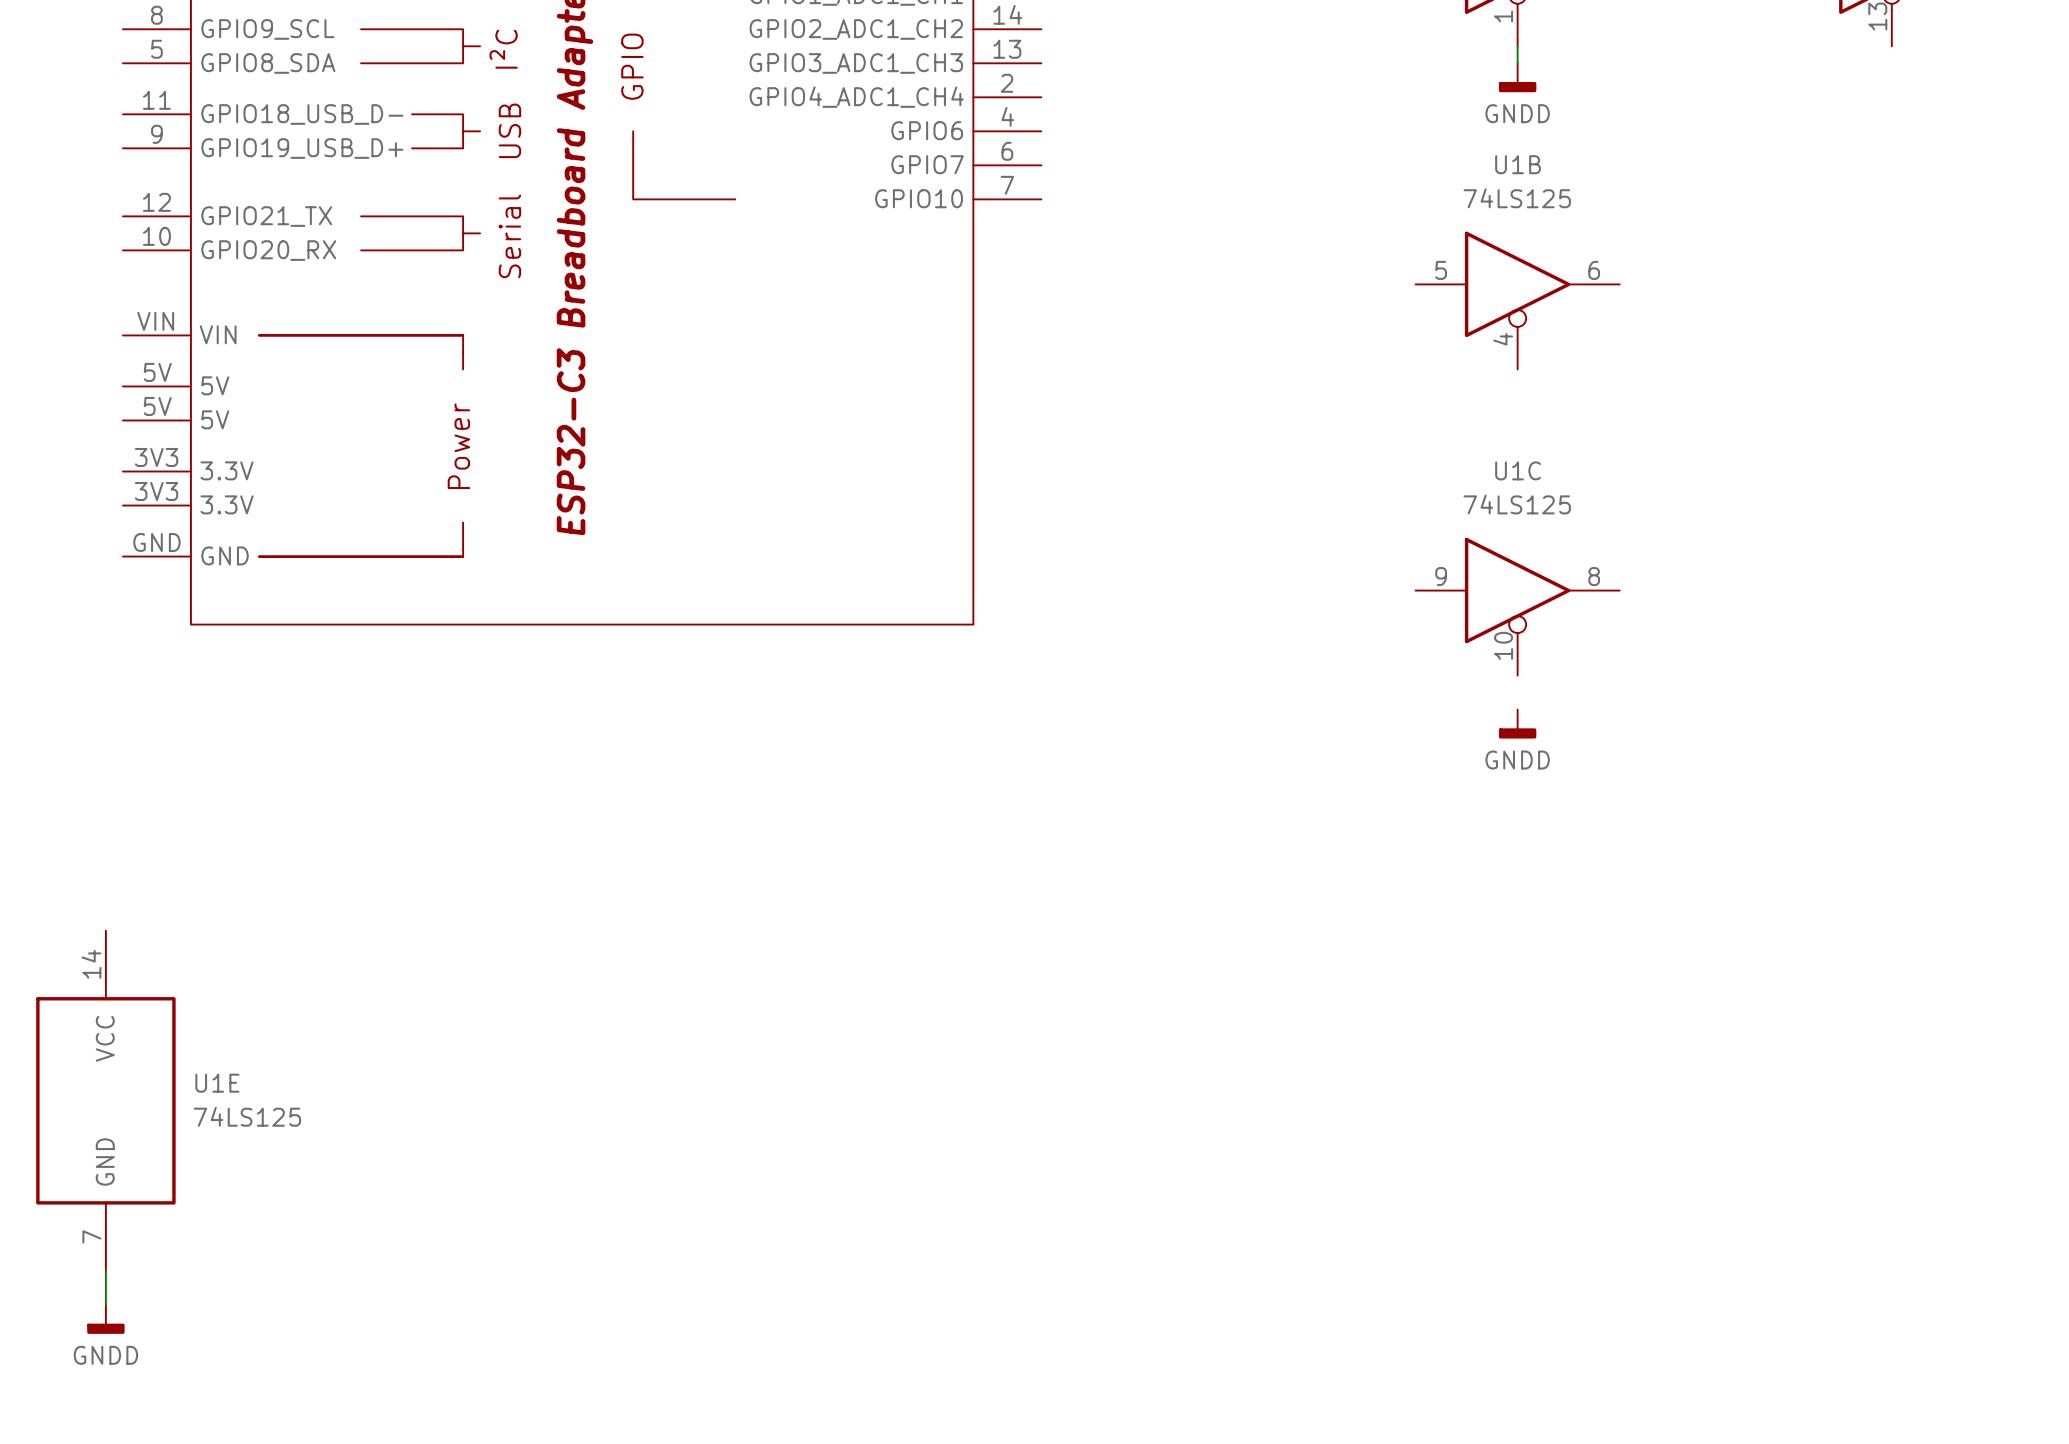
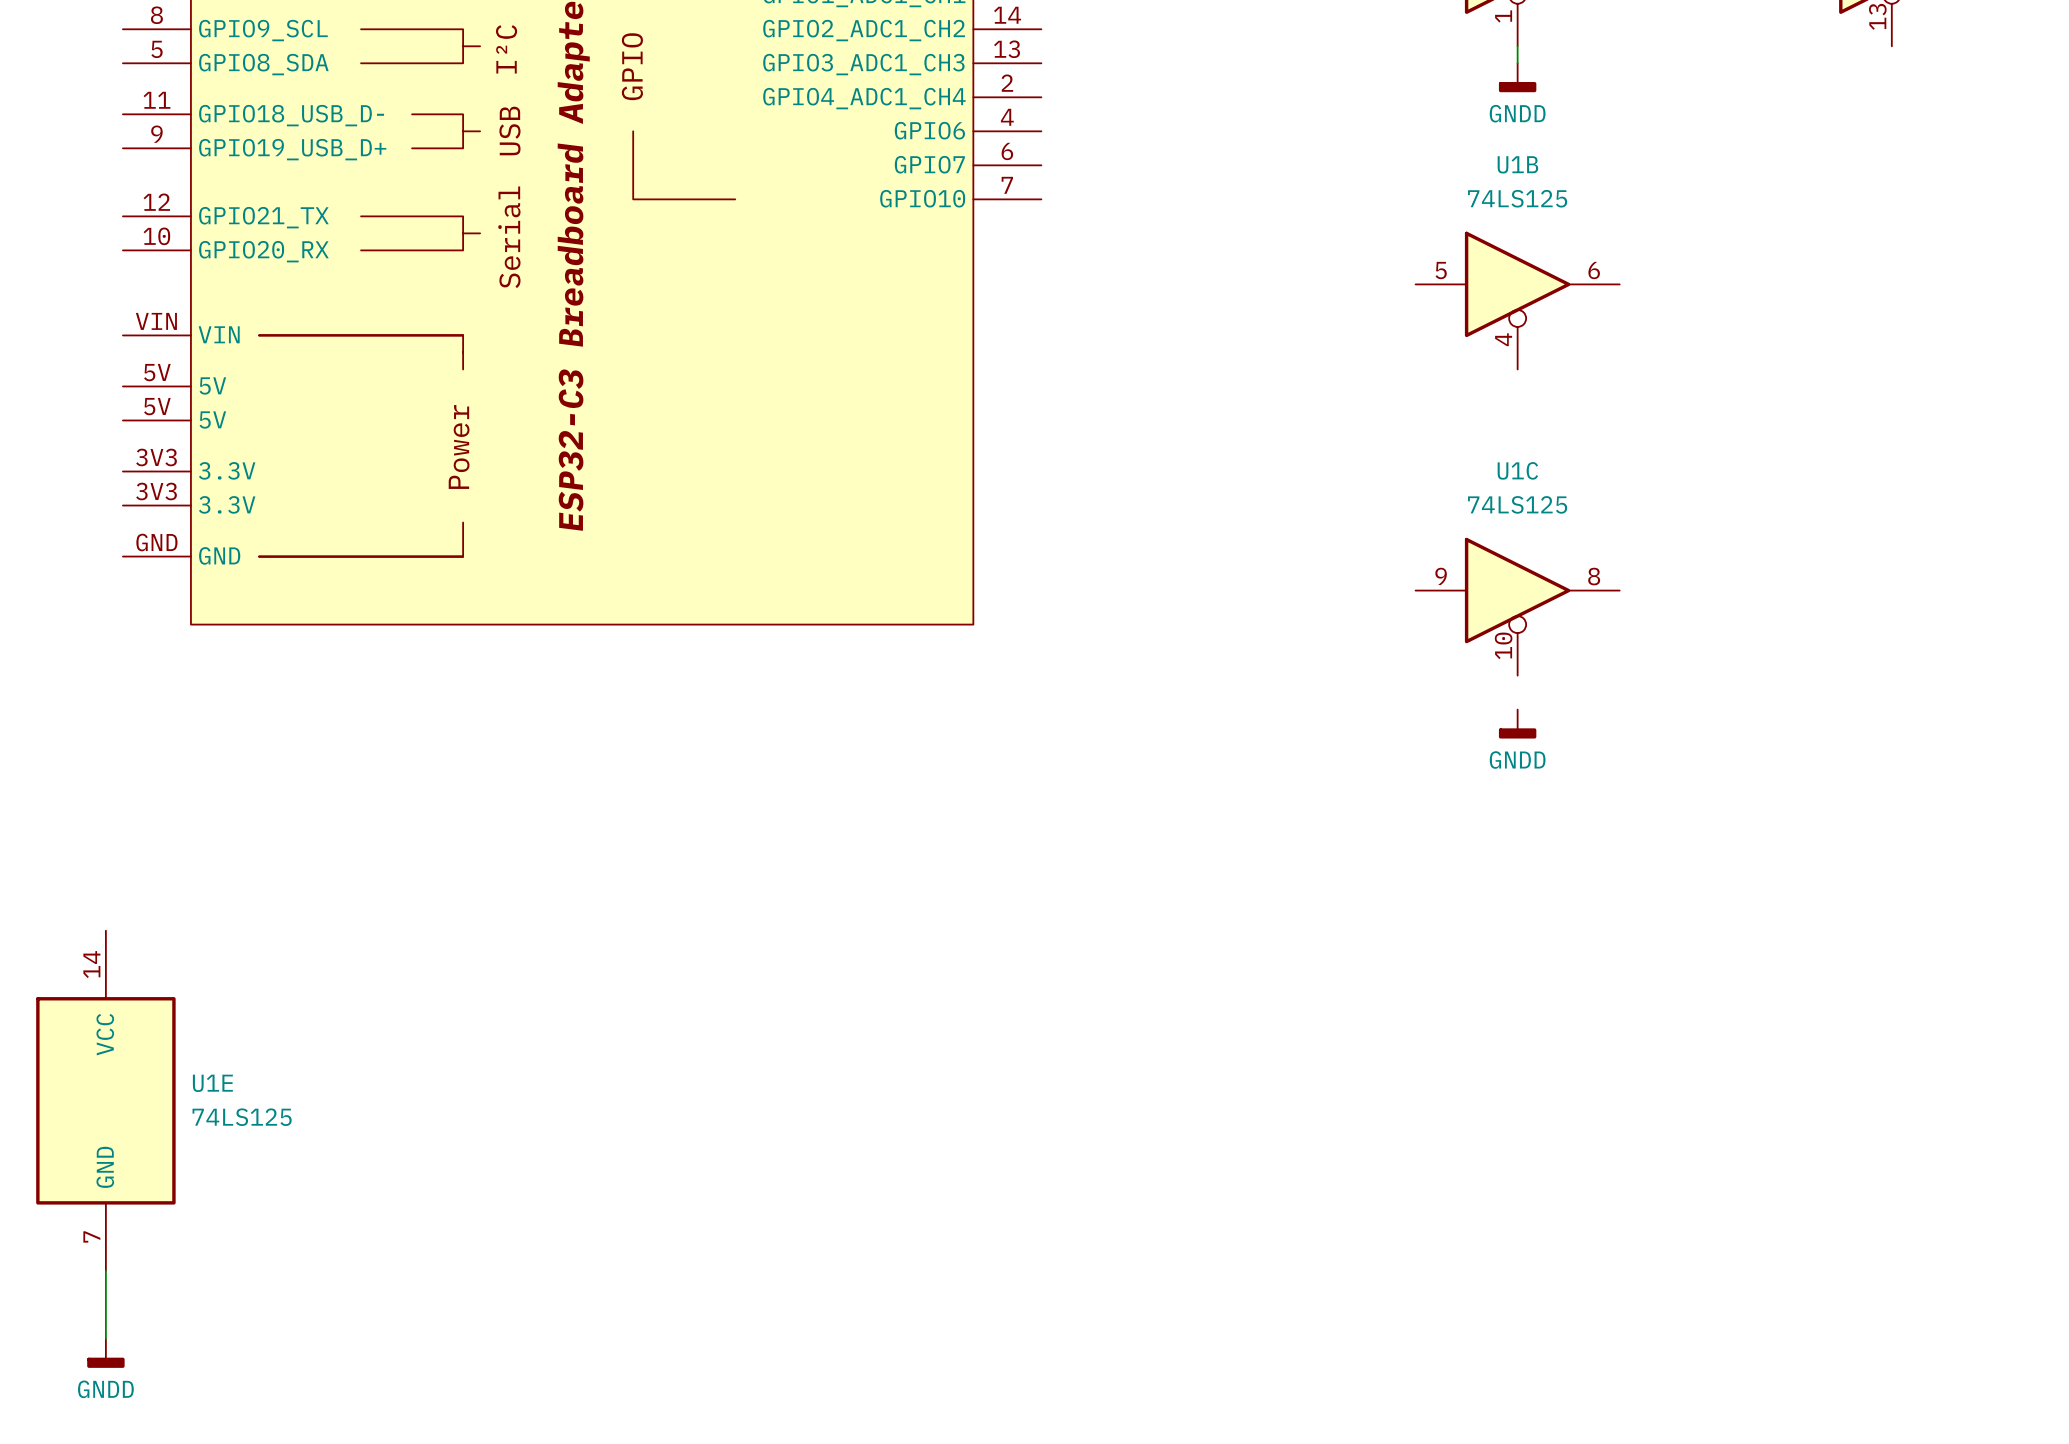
power symbol position: GNDD (105, 1319) -> GNDD (105, 1353)

